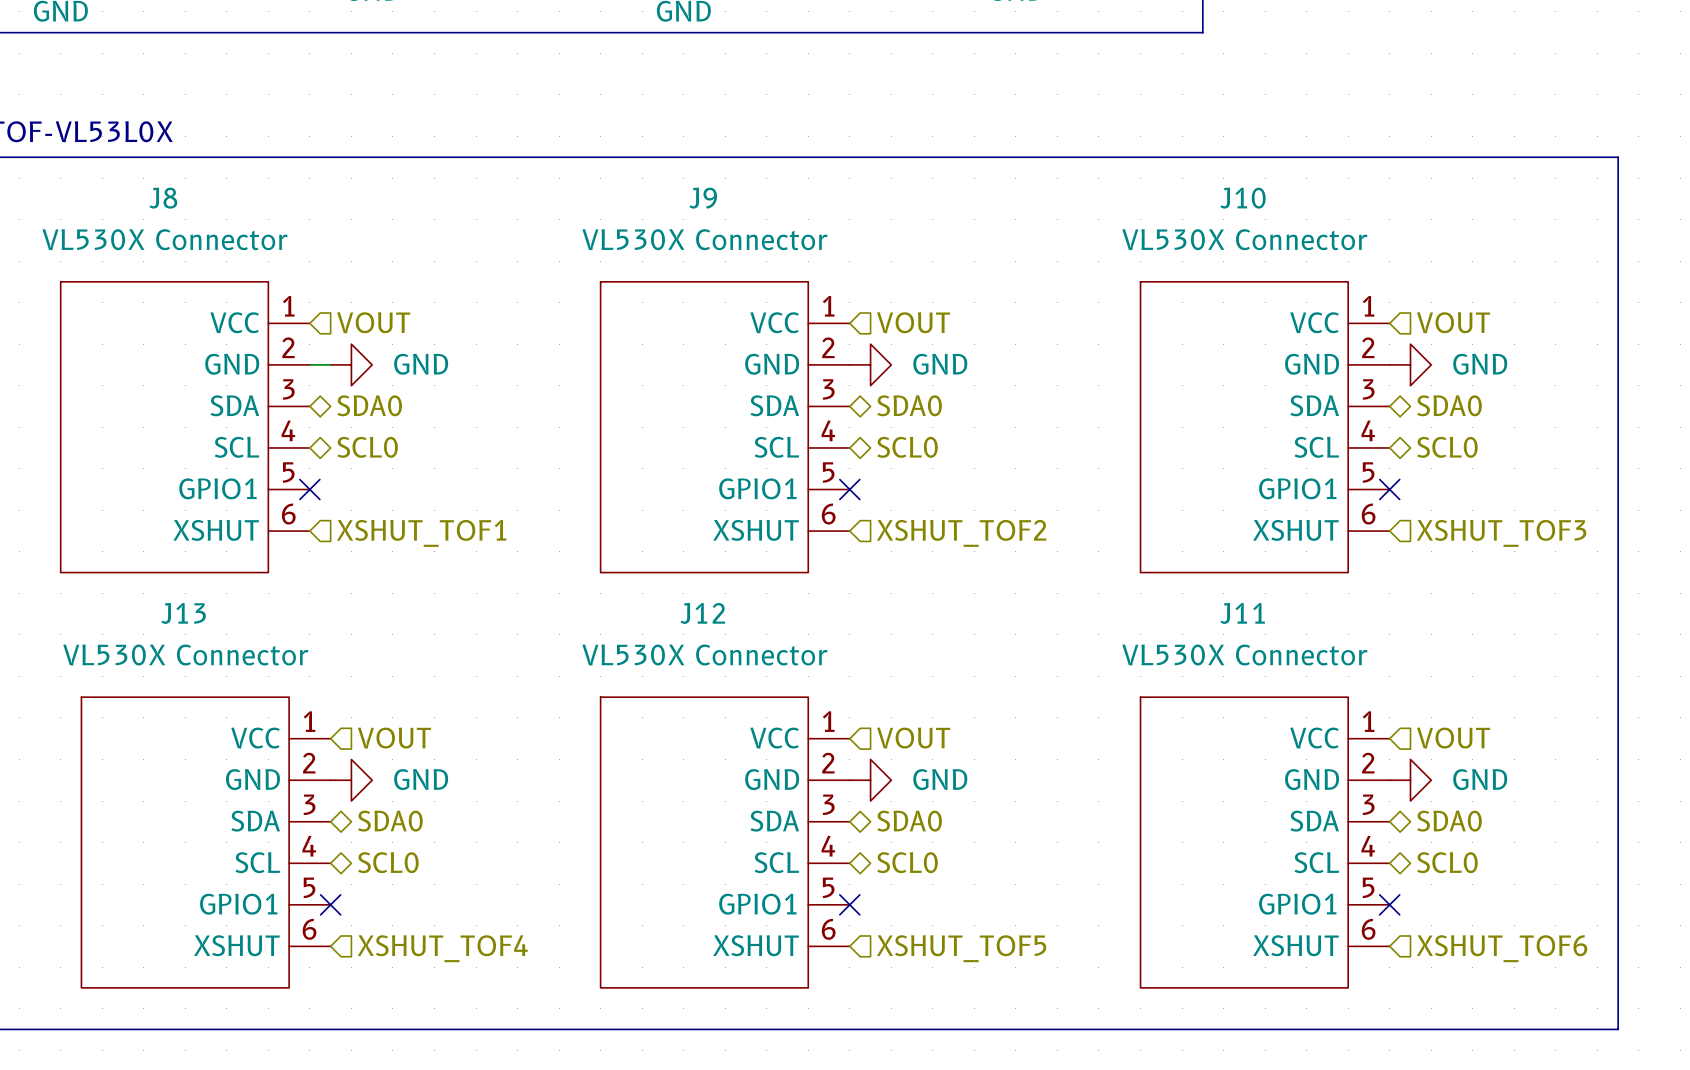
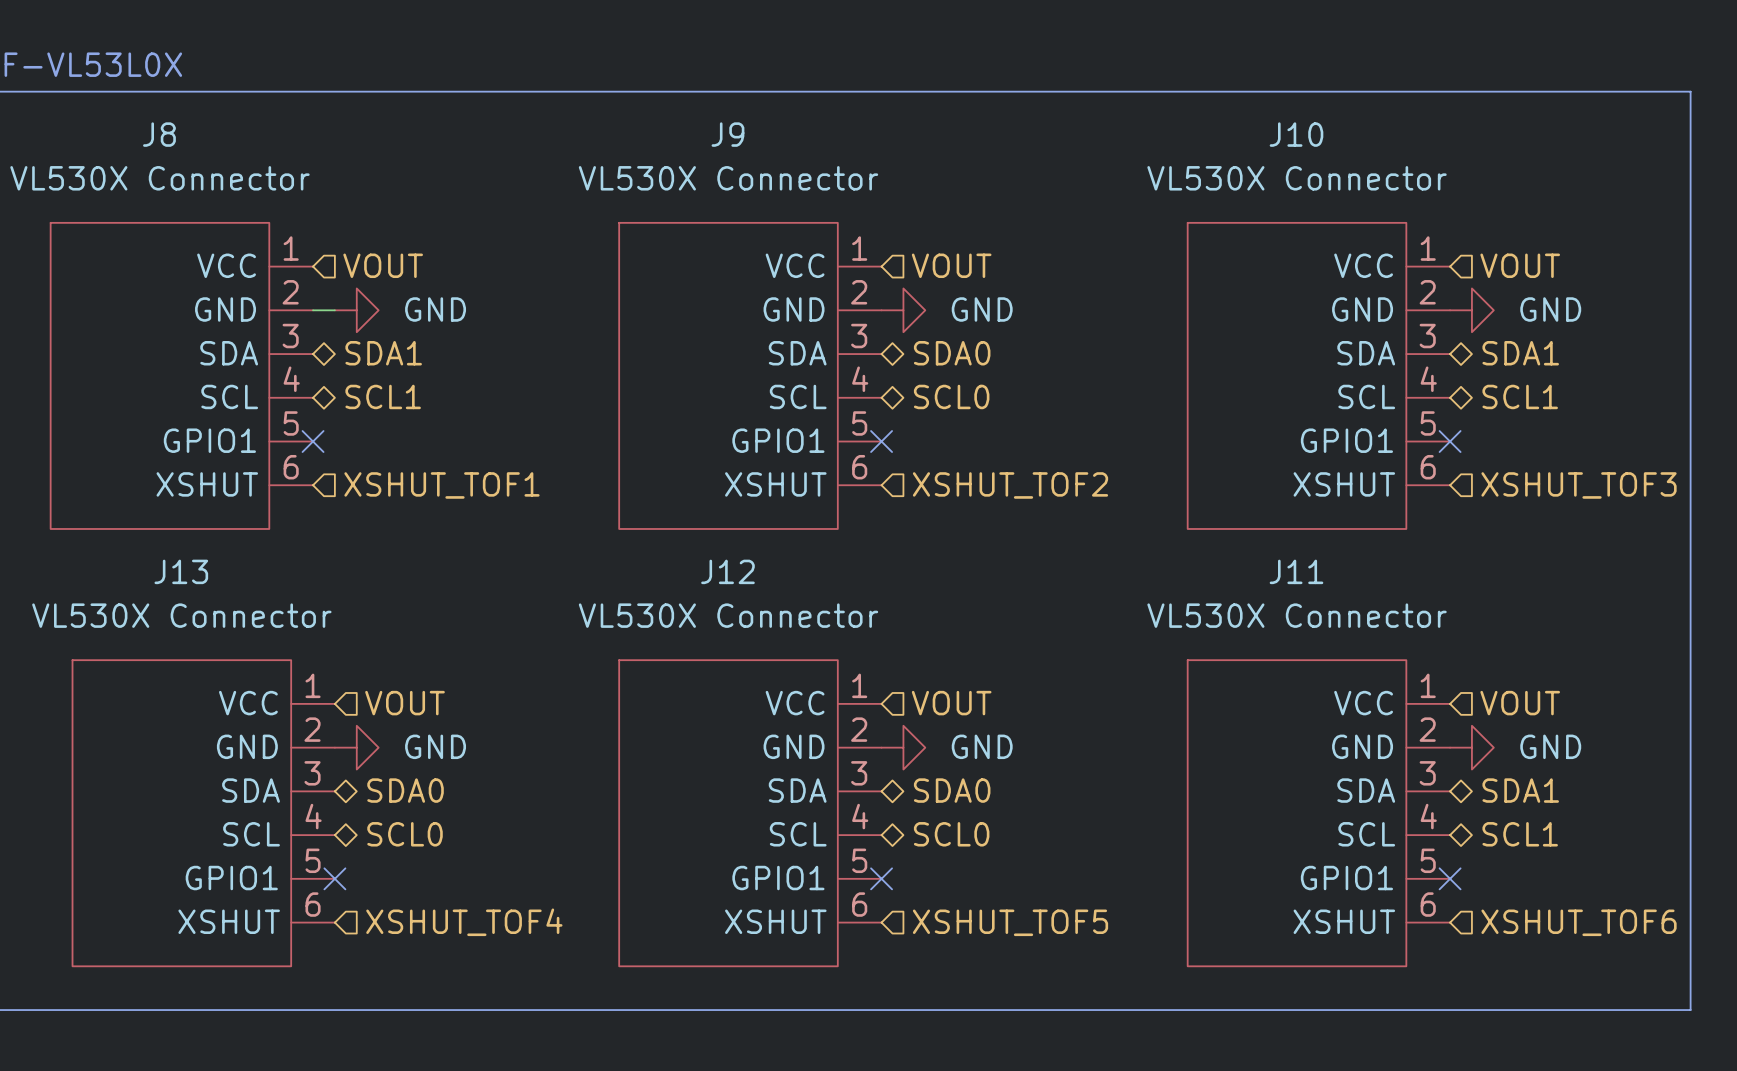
hierarchical label: SDA0 (369, 405) -> SDA1 (383, 353)
hierarchical label: SDA0 (1449, 405) -> SDA1 (1520, 353)
hierarchical label: SCL0 (367, 447) -> SCL1 (383, 396)
hierarchical label: SCL0 (1447, 447) -> SCL1 (1520, 396)
hierarchical label: SDA0 (1449, 821) -> SDA1 (1520, 790)
hierarchical label: SCL0 (1447, 862) -> SCL1 (1520, 834)

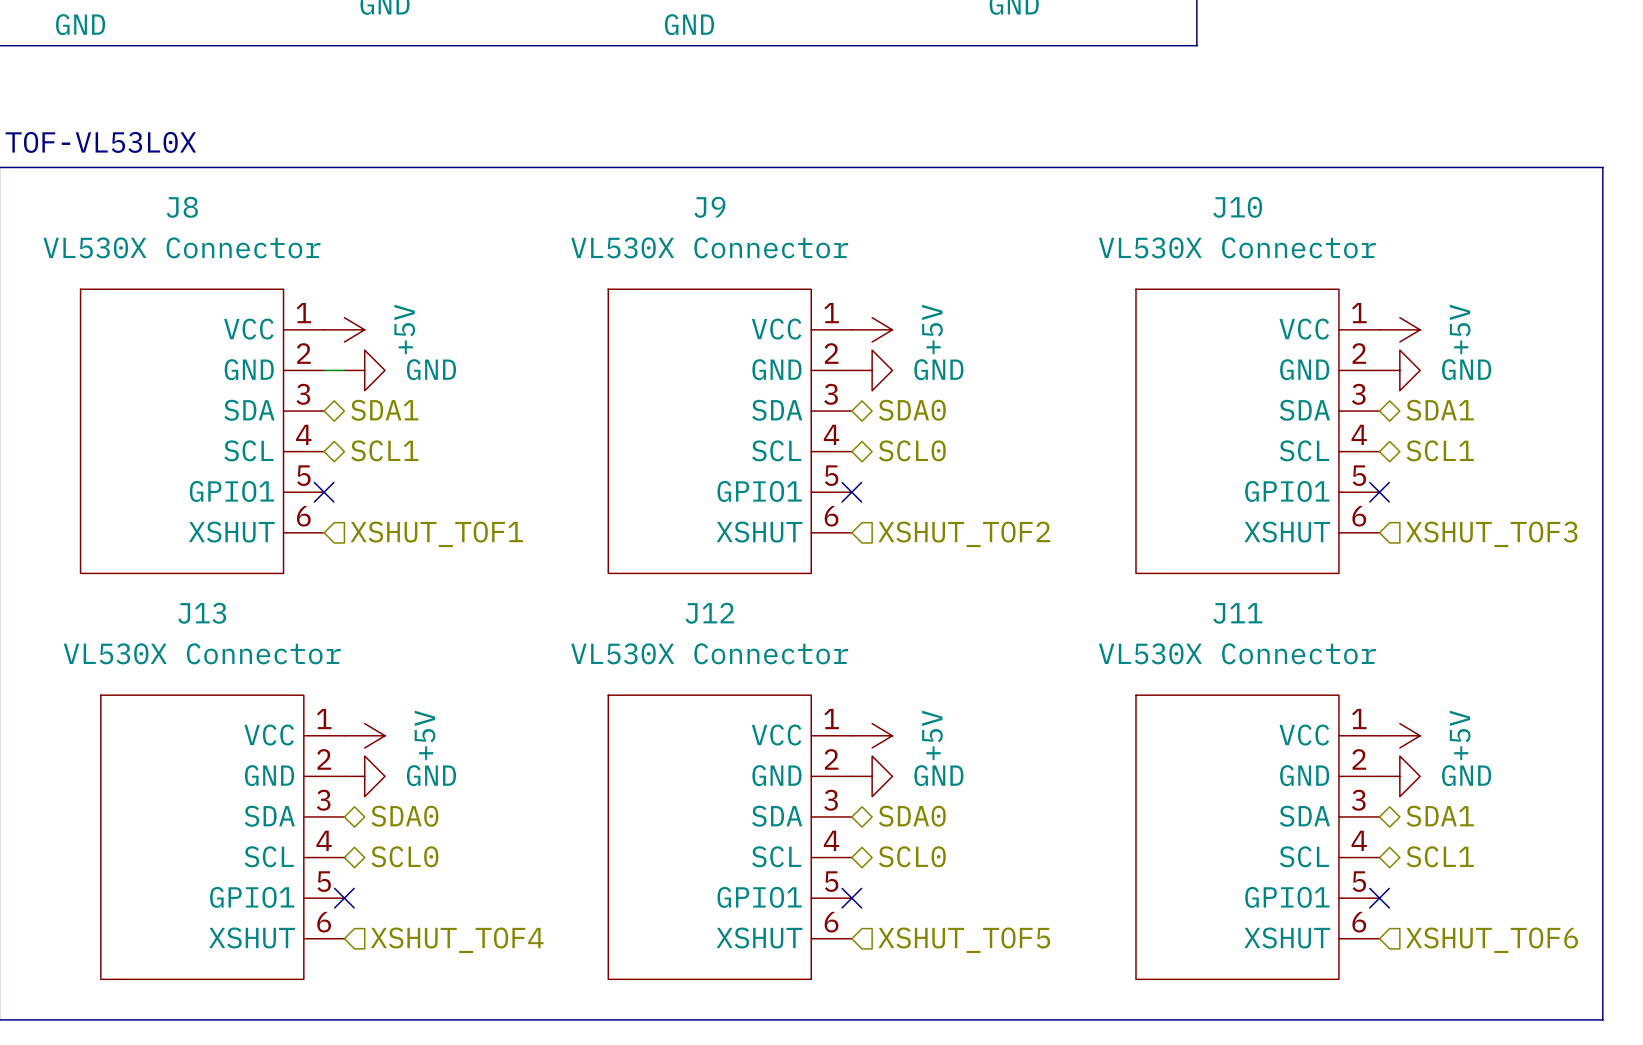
hierarchical label: VOUT (383, 265) -> none
hierarchical label: VOUT (951, 265) -> none
hierarchical label: VOUT (1520, 265) -> none
power symbol: none -> +5V (344, 329)
power symbol: none -> +5V (872, 329)
power symbol: none -> +5V (1399, 329)
power symbol: none -> +5V (364, 735)
hierarchical label: VOUT (405, 703) -> none
power symbol: none -> +5V (872, 735)
hierarchical label: VOUT (951, 703) -> none
power symbol: none -> +5V (1399, 735)
hierarchical label: VOUT (1520, 703) -> none

